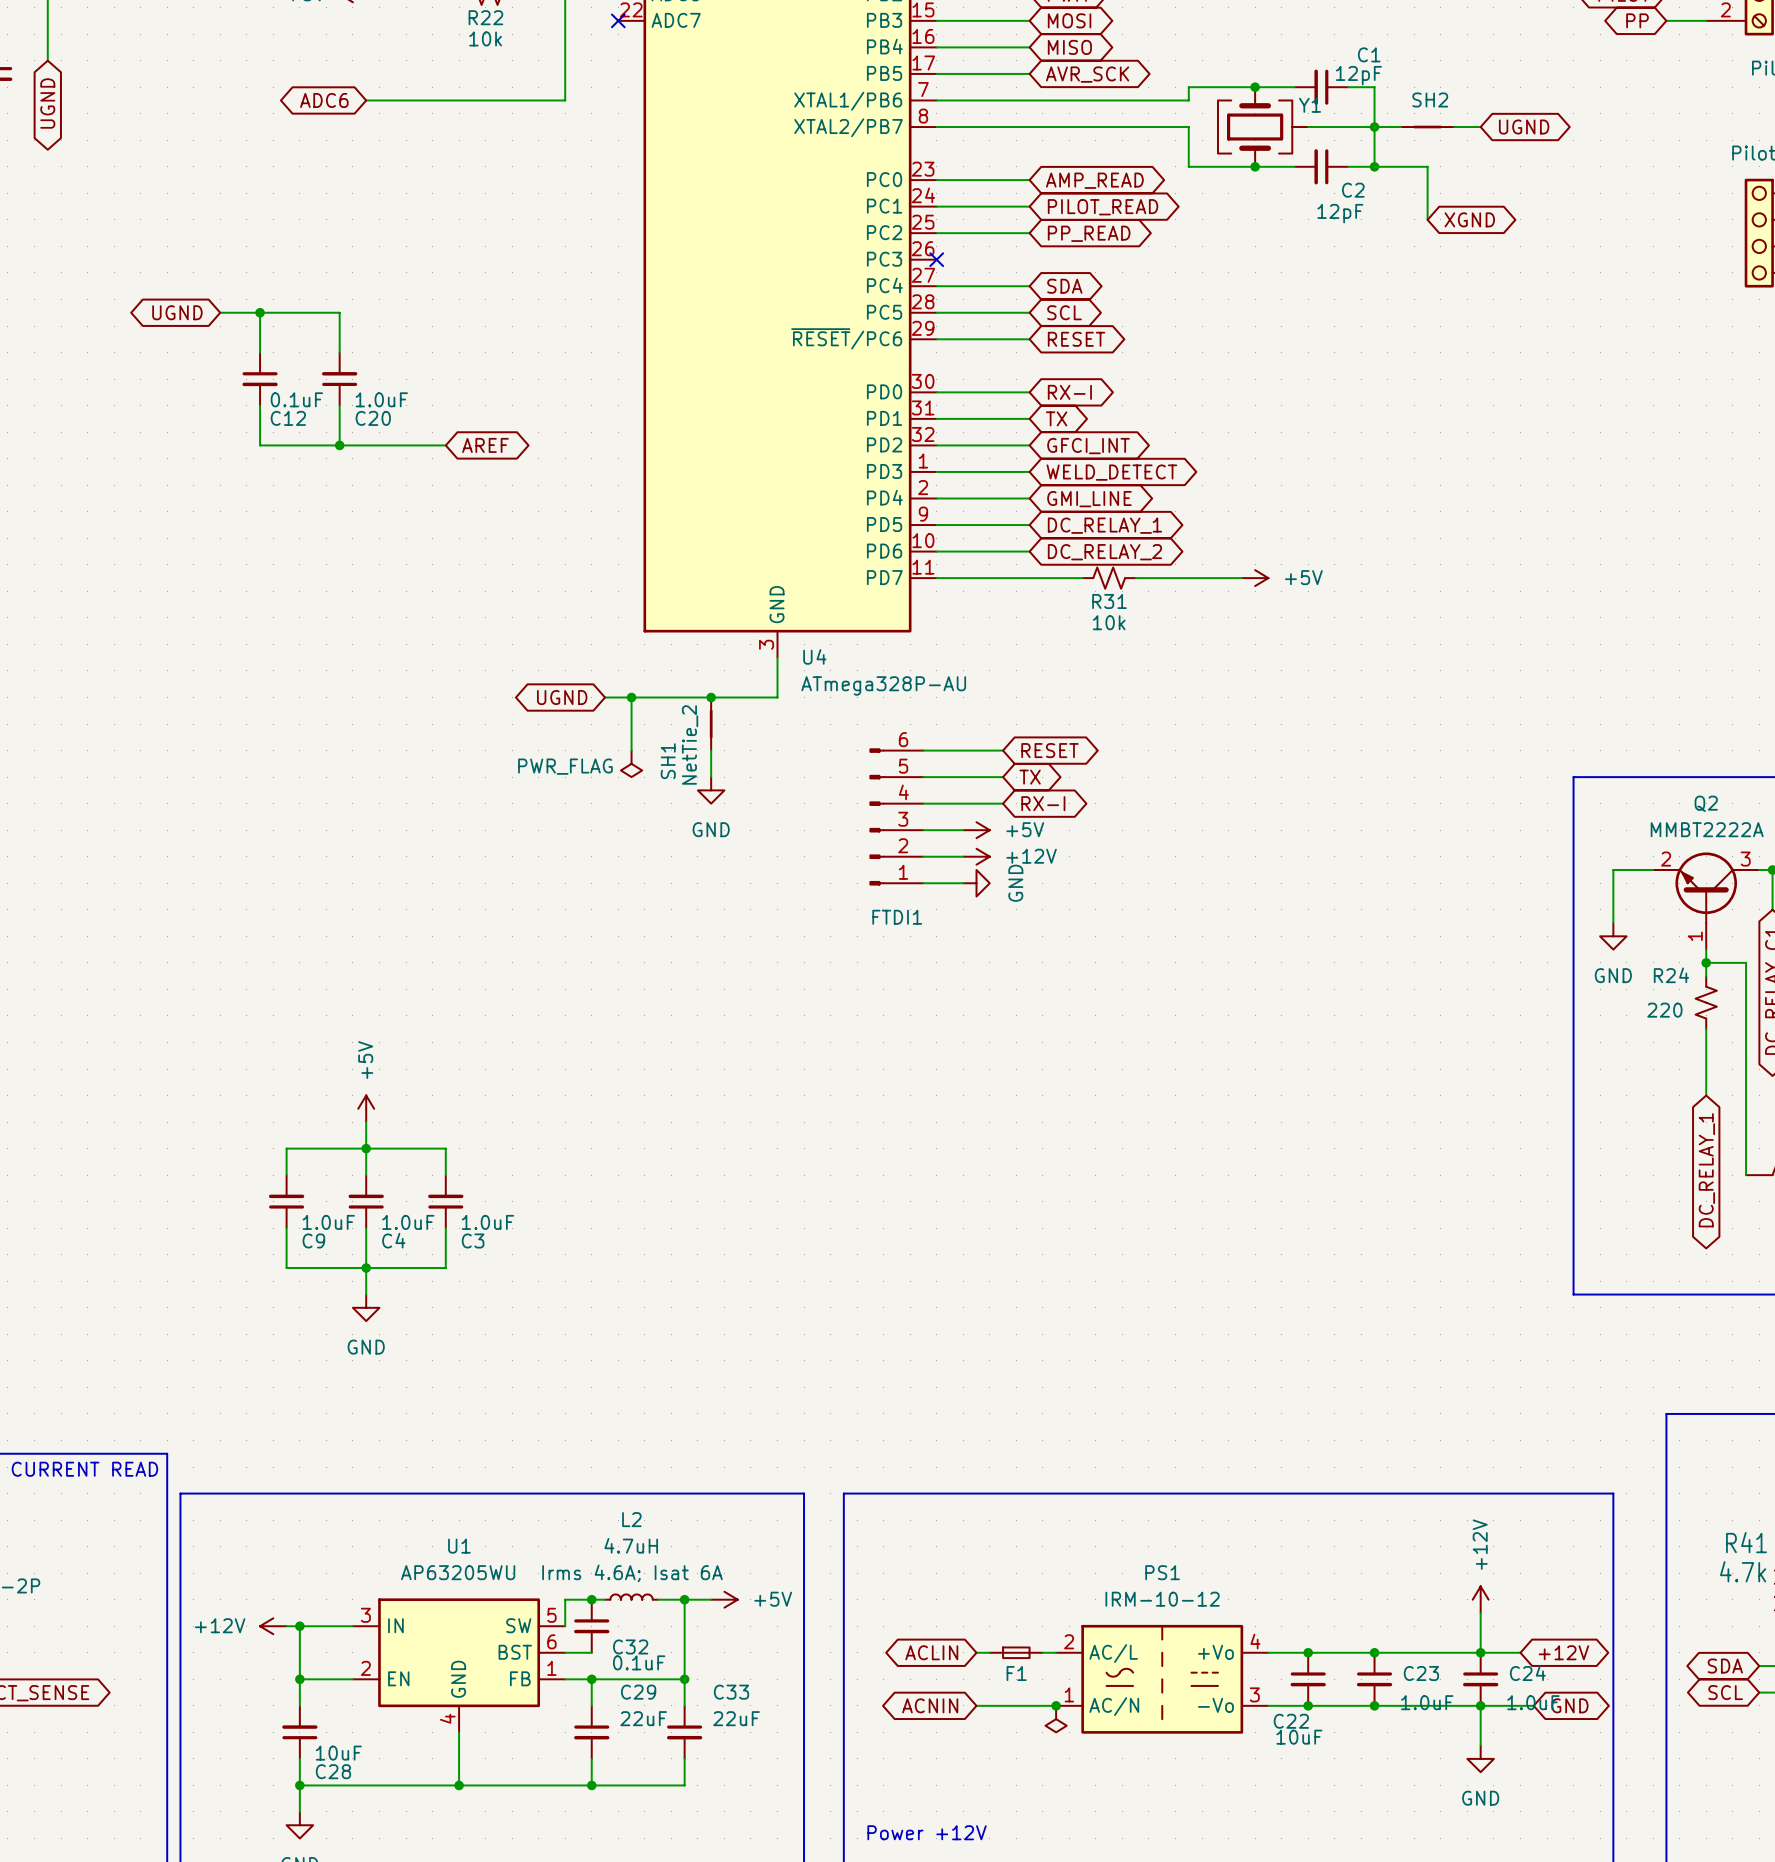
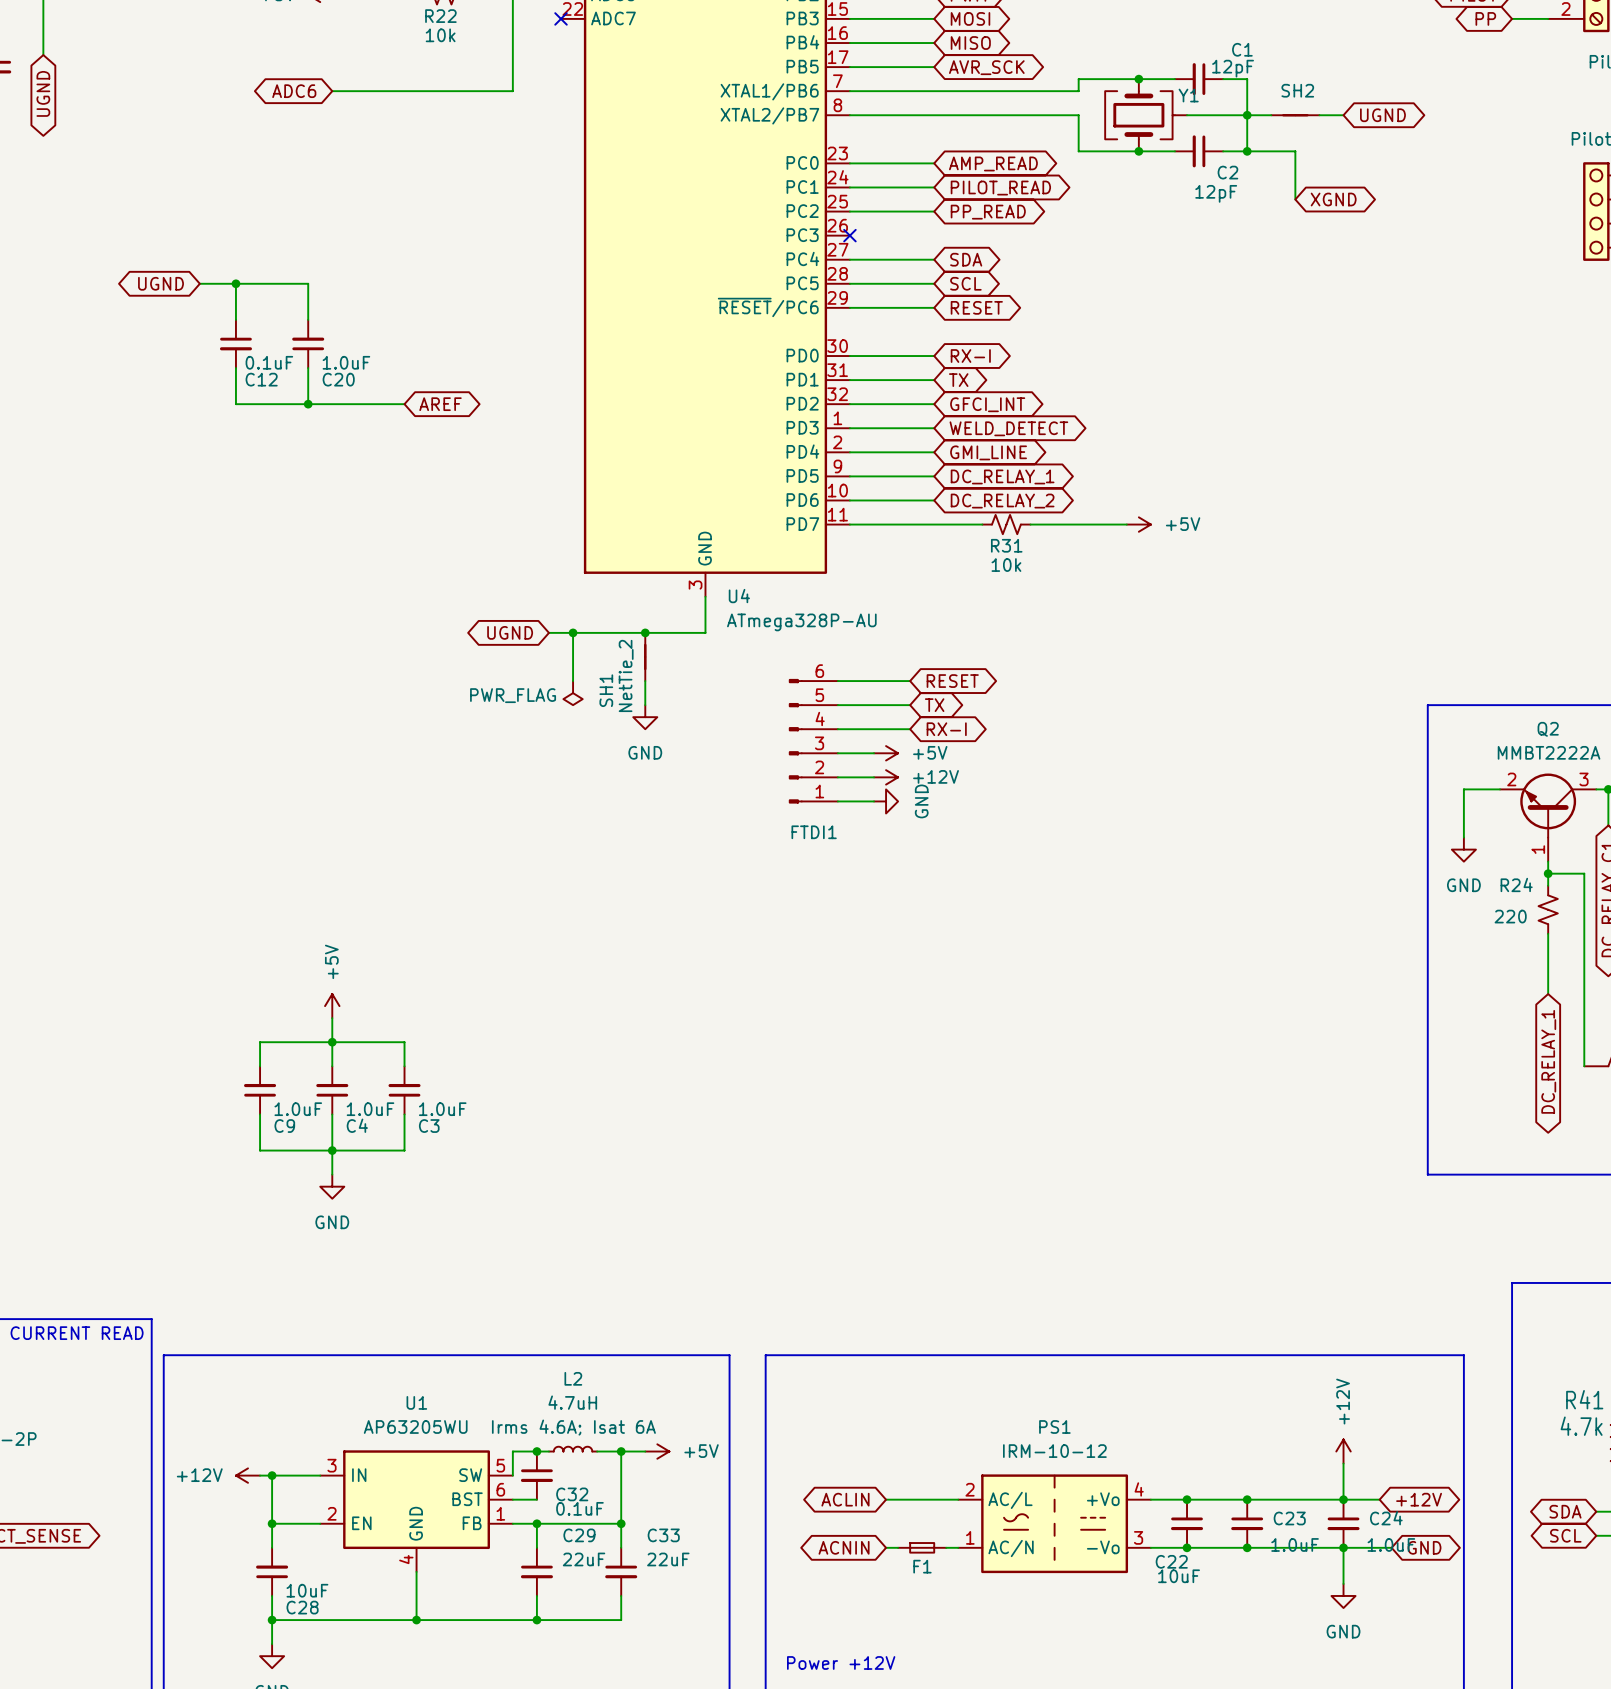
F1 position: (1016, 1652) -> (922, 1547)
junction: (1056, 1705) -> none
power symbol: (1056, 1719) -> none

